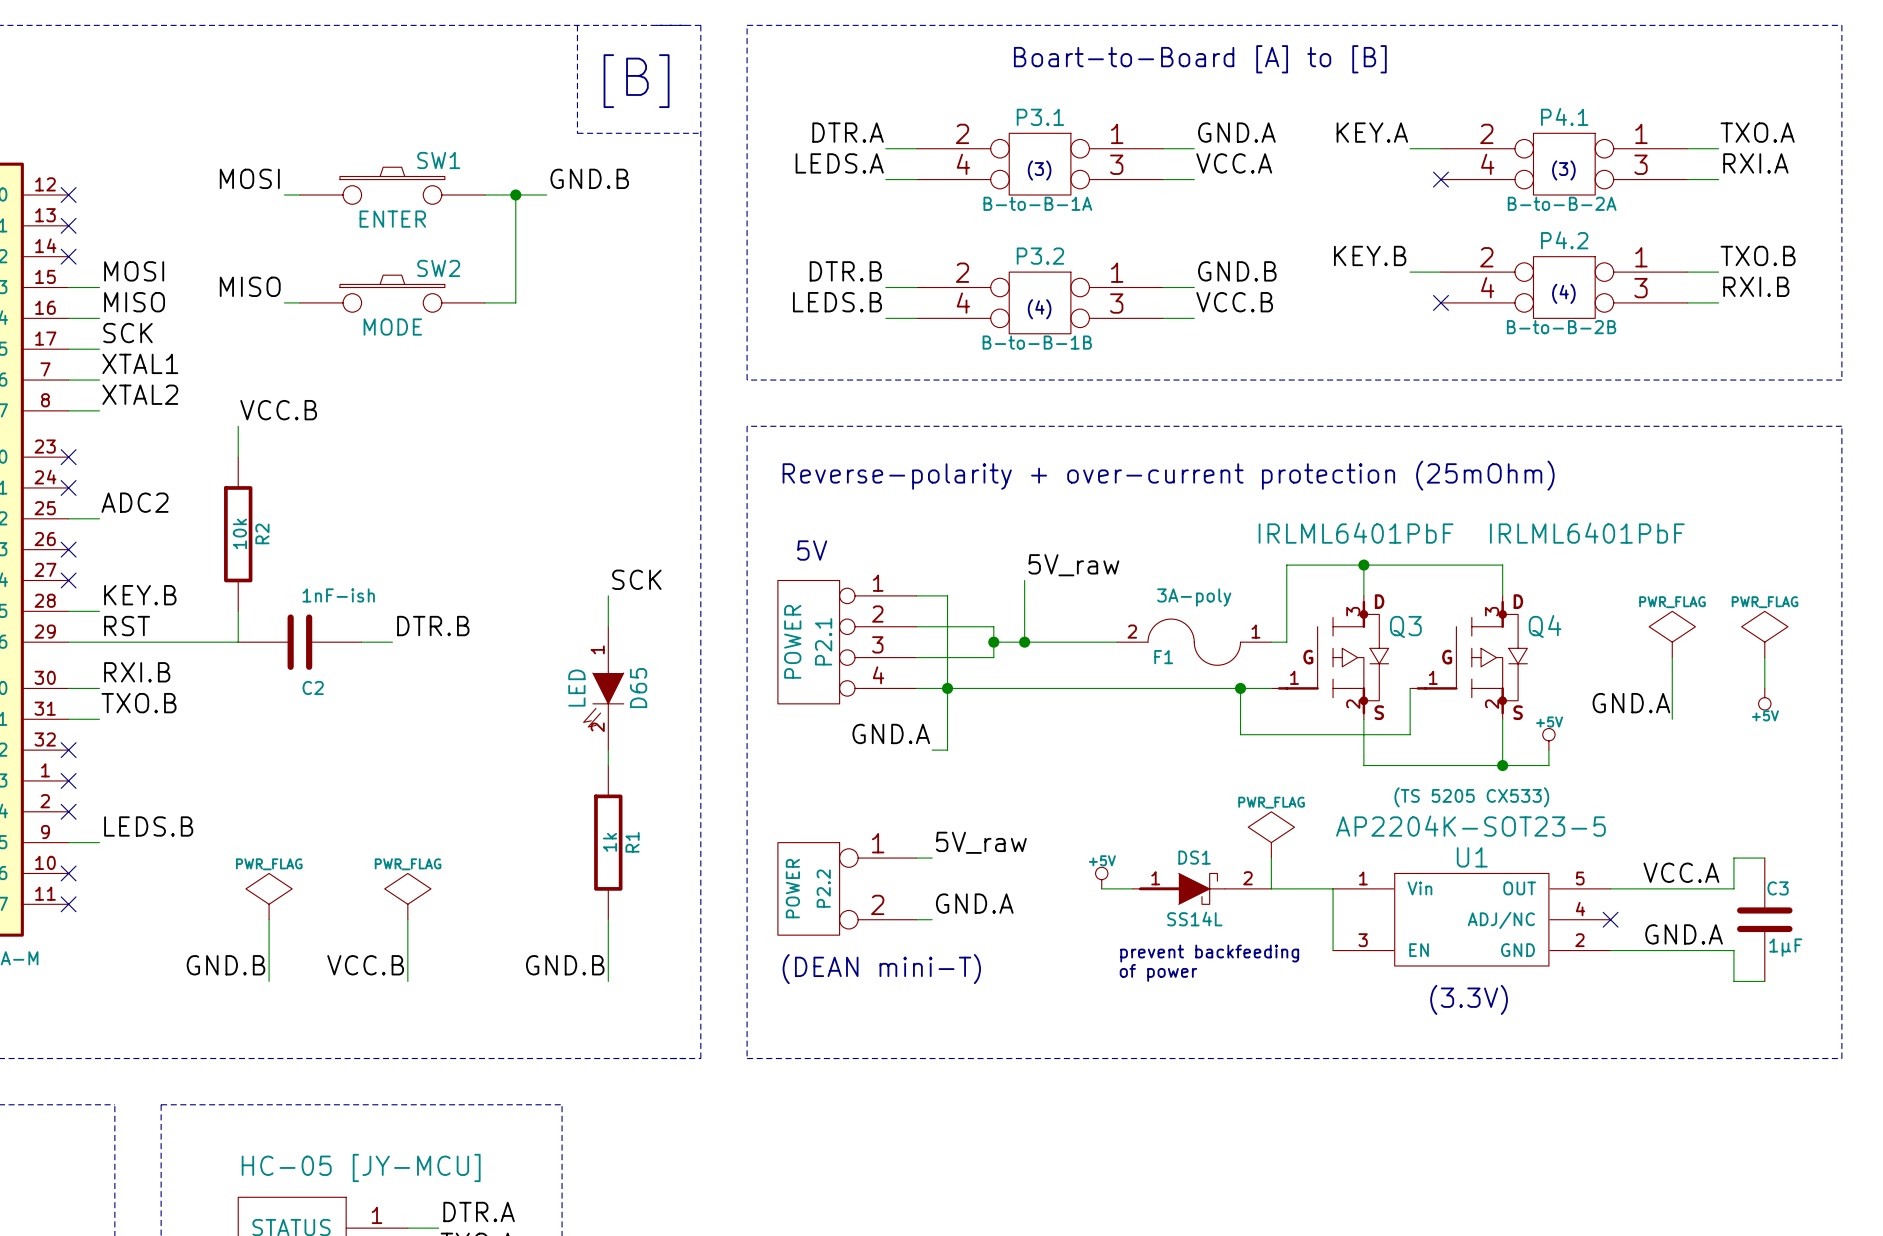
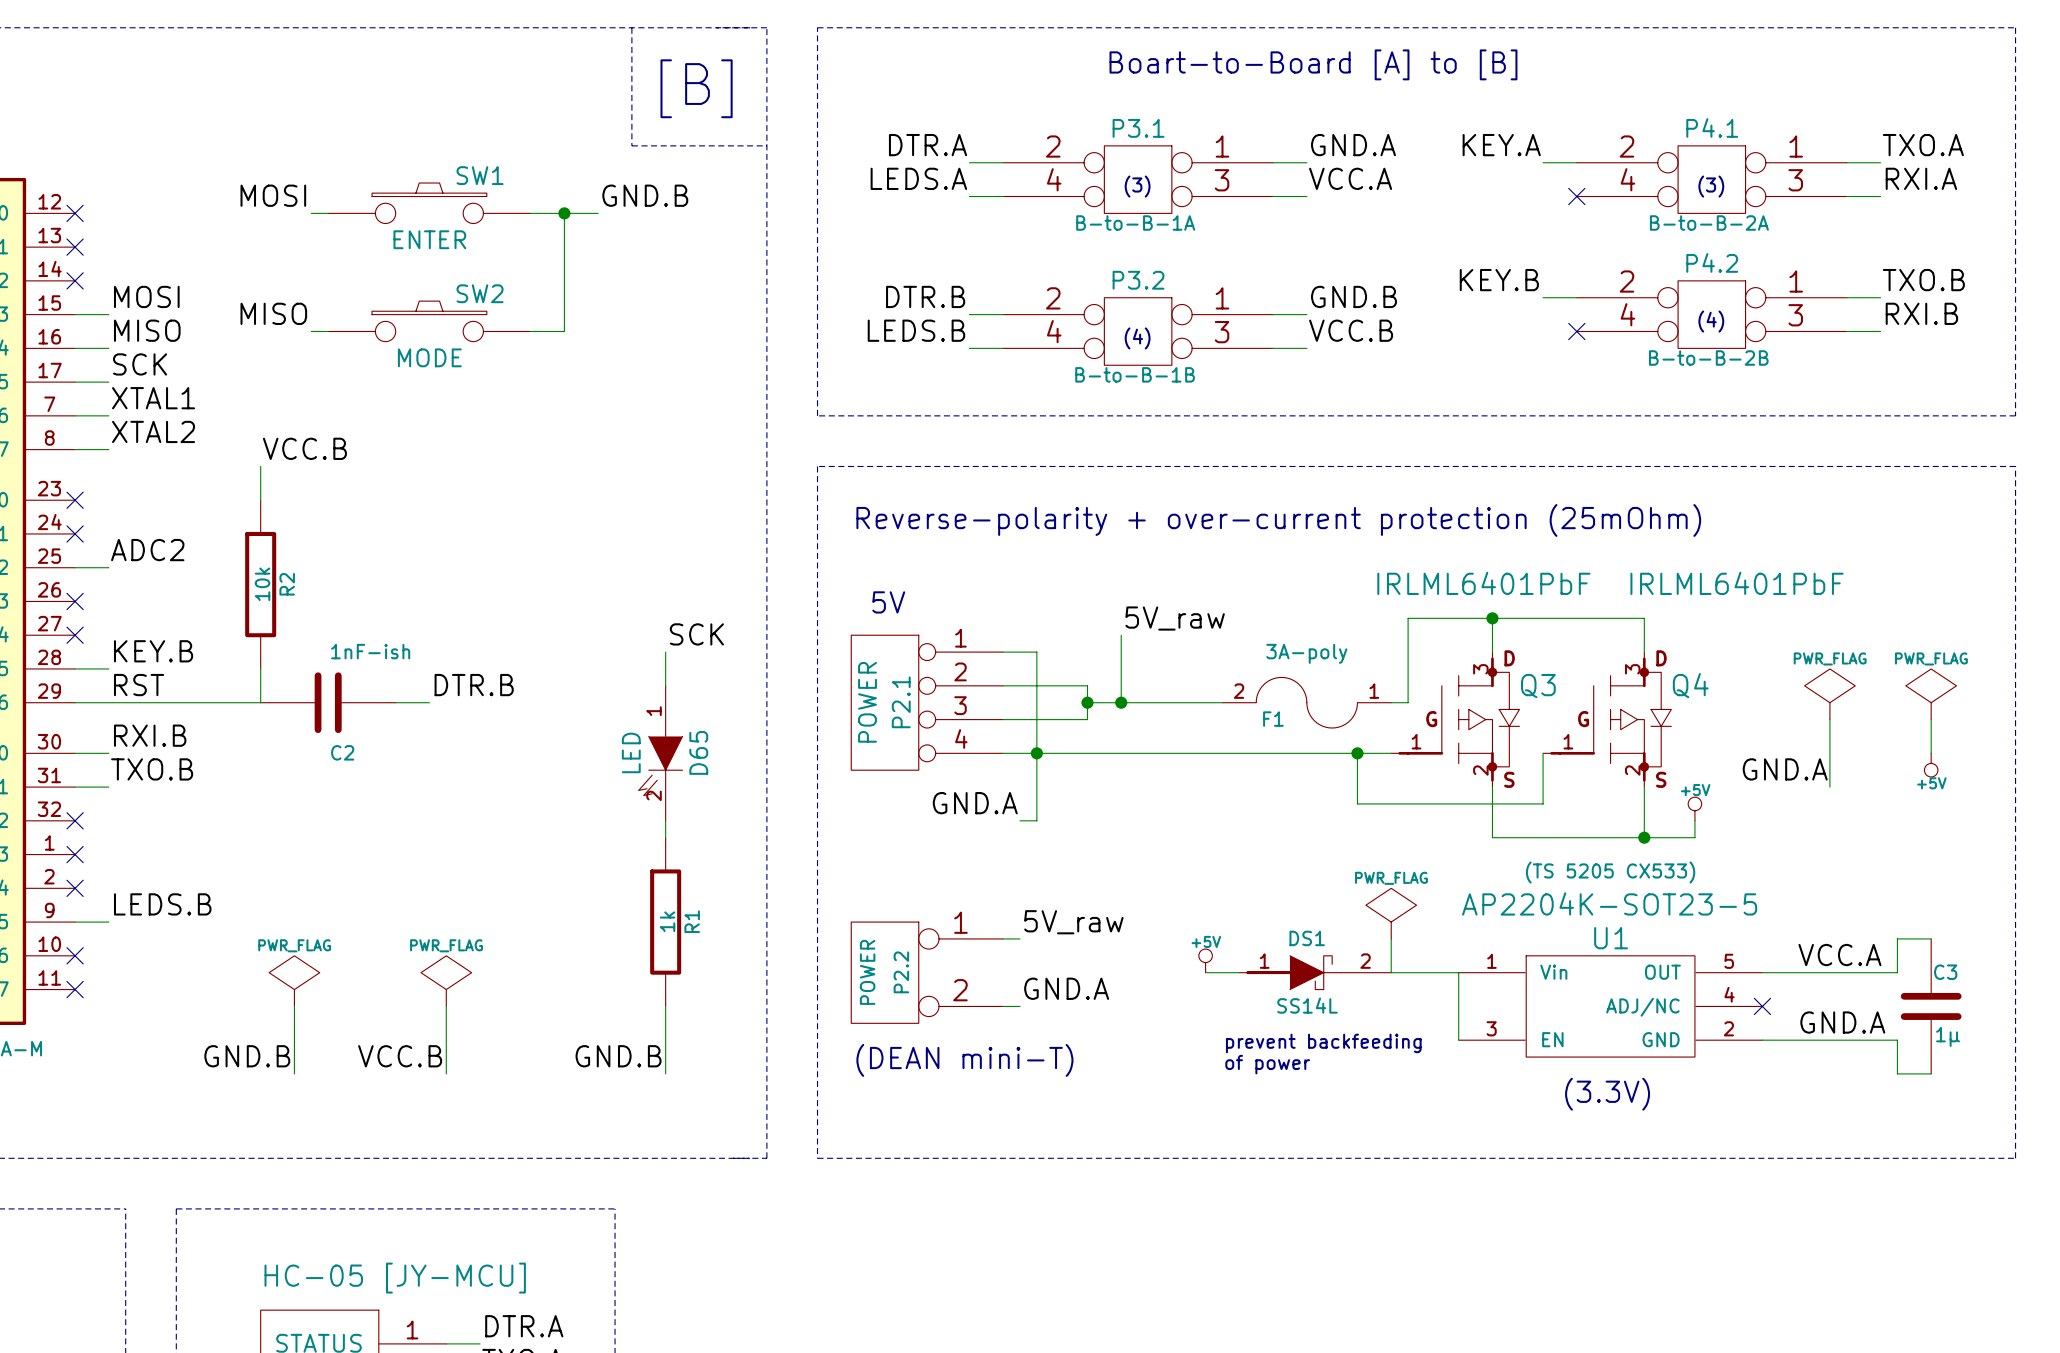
C3 value: 1µF (1785, 947) -> 1µ (1948, 1036)

